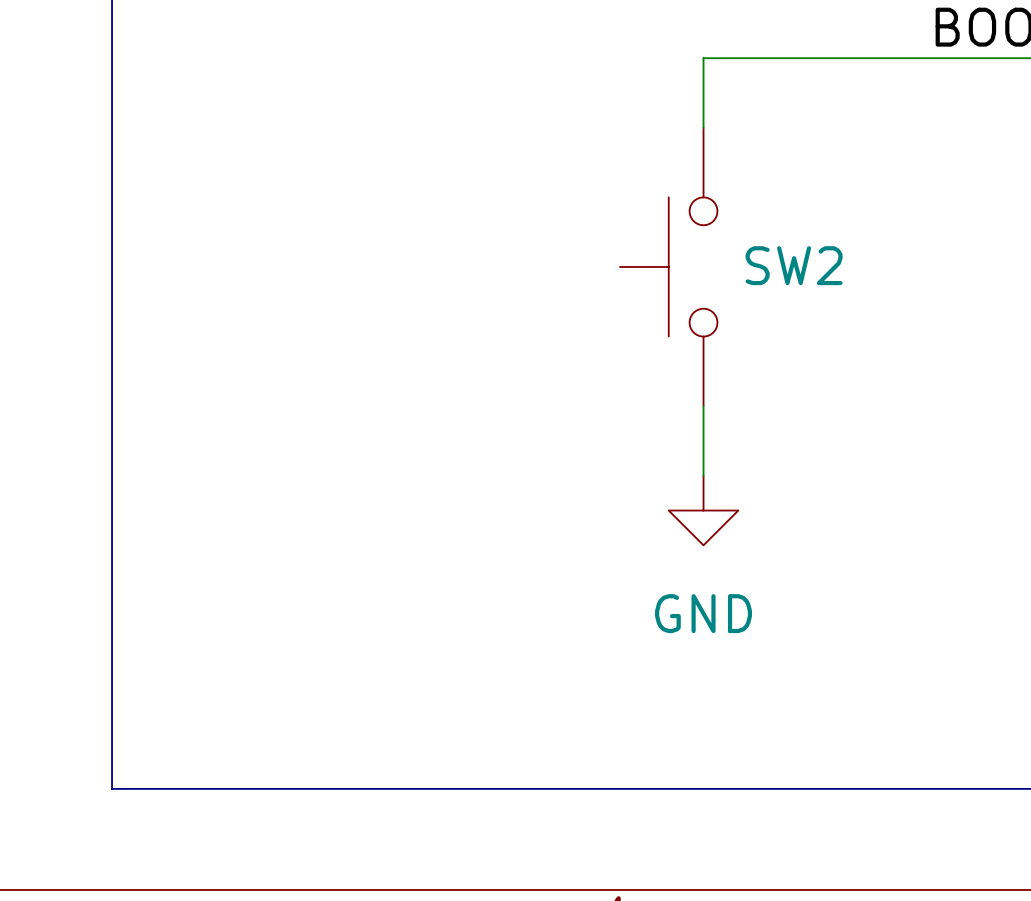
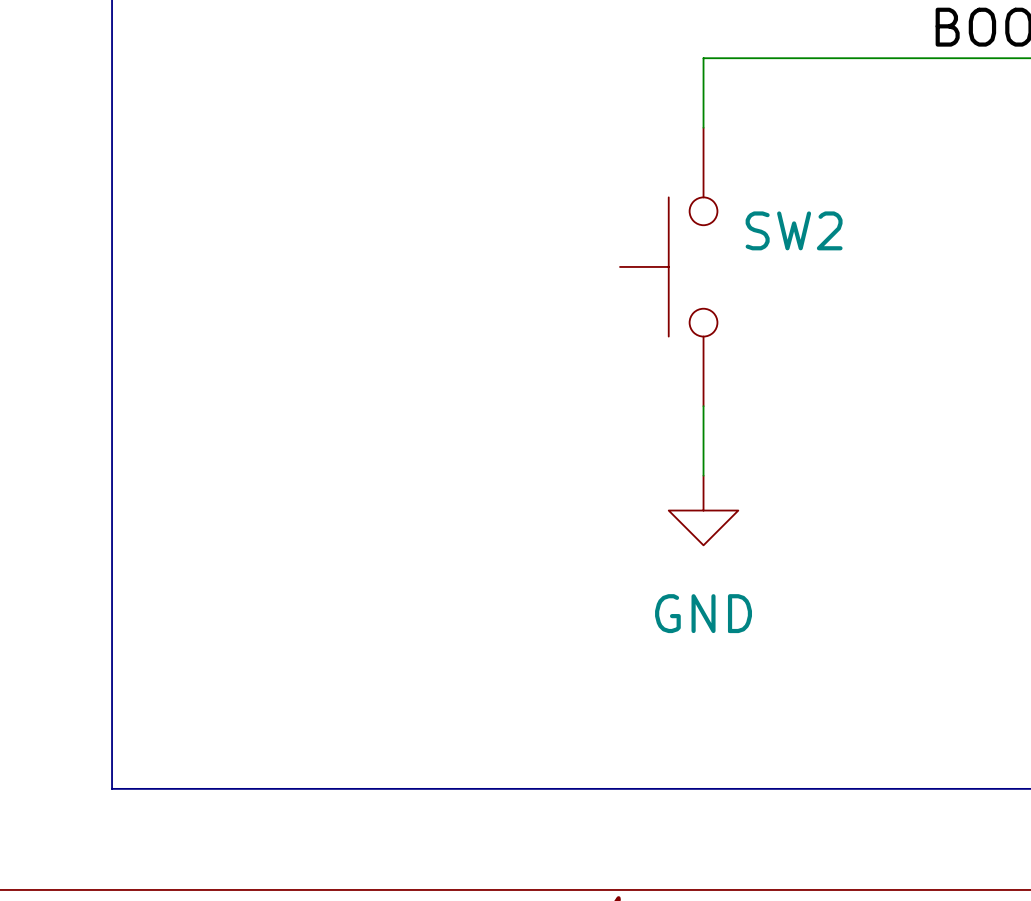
SW2 name position: SW2 (794, 265) -> SW2 (794, 230)

